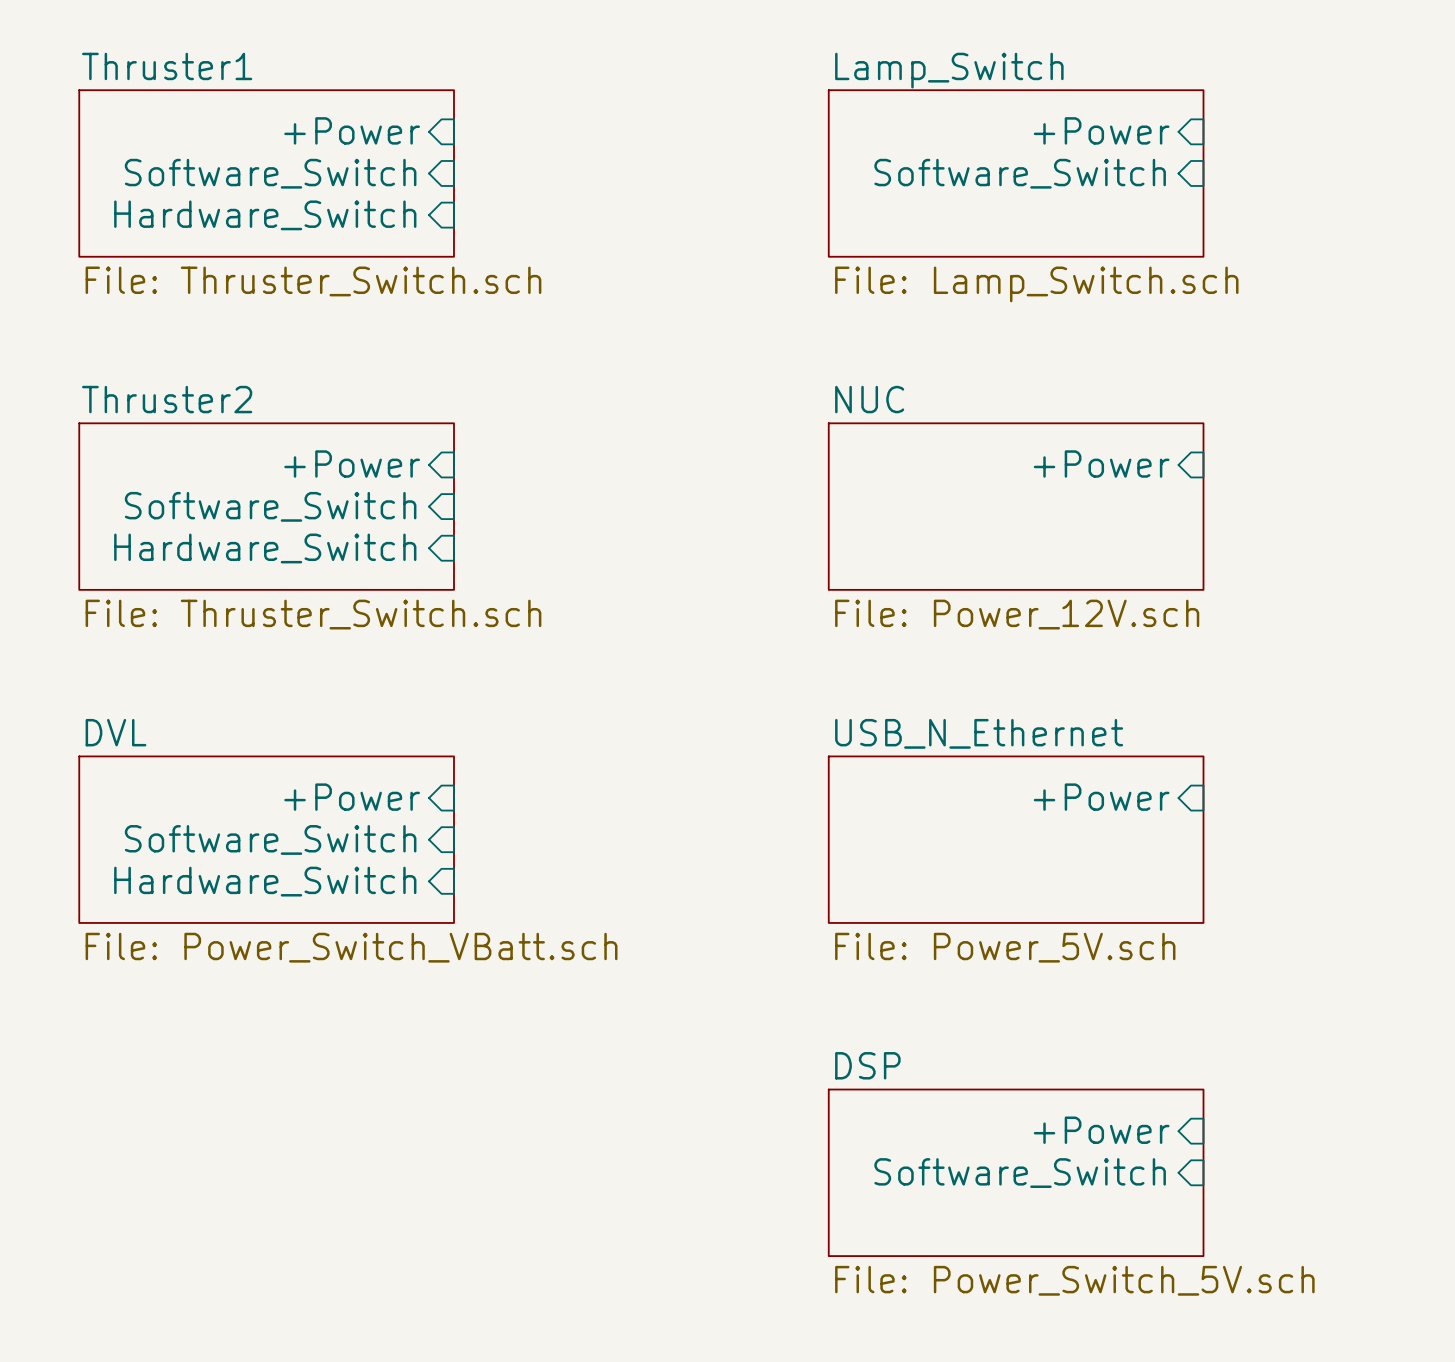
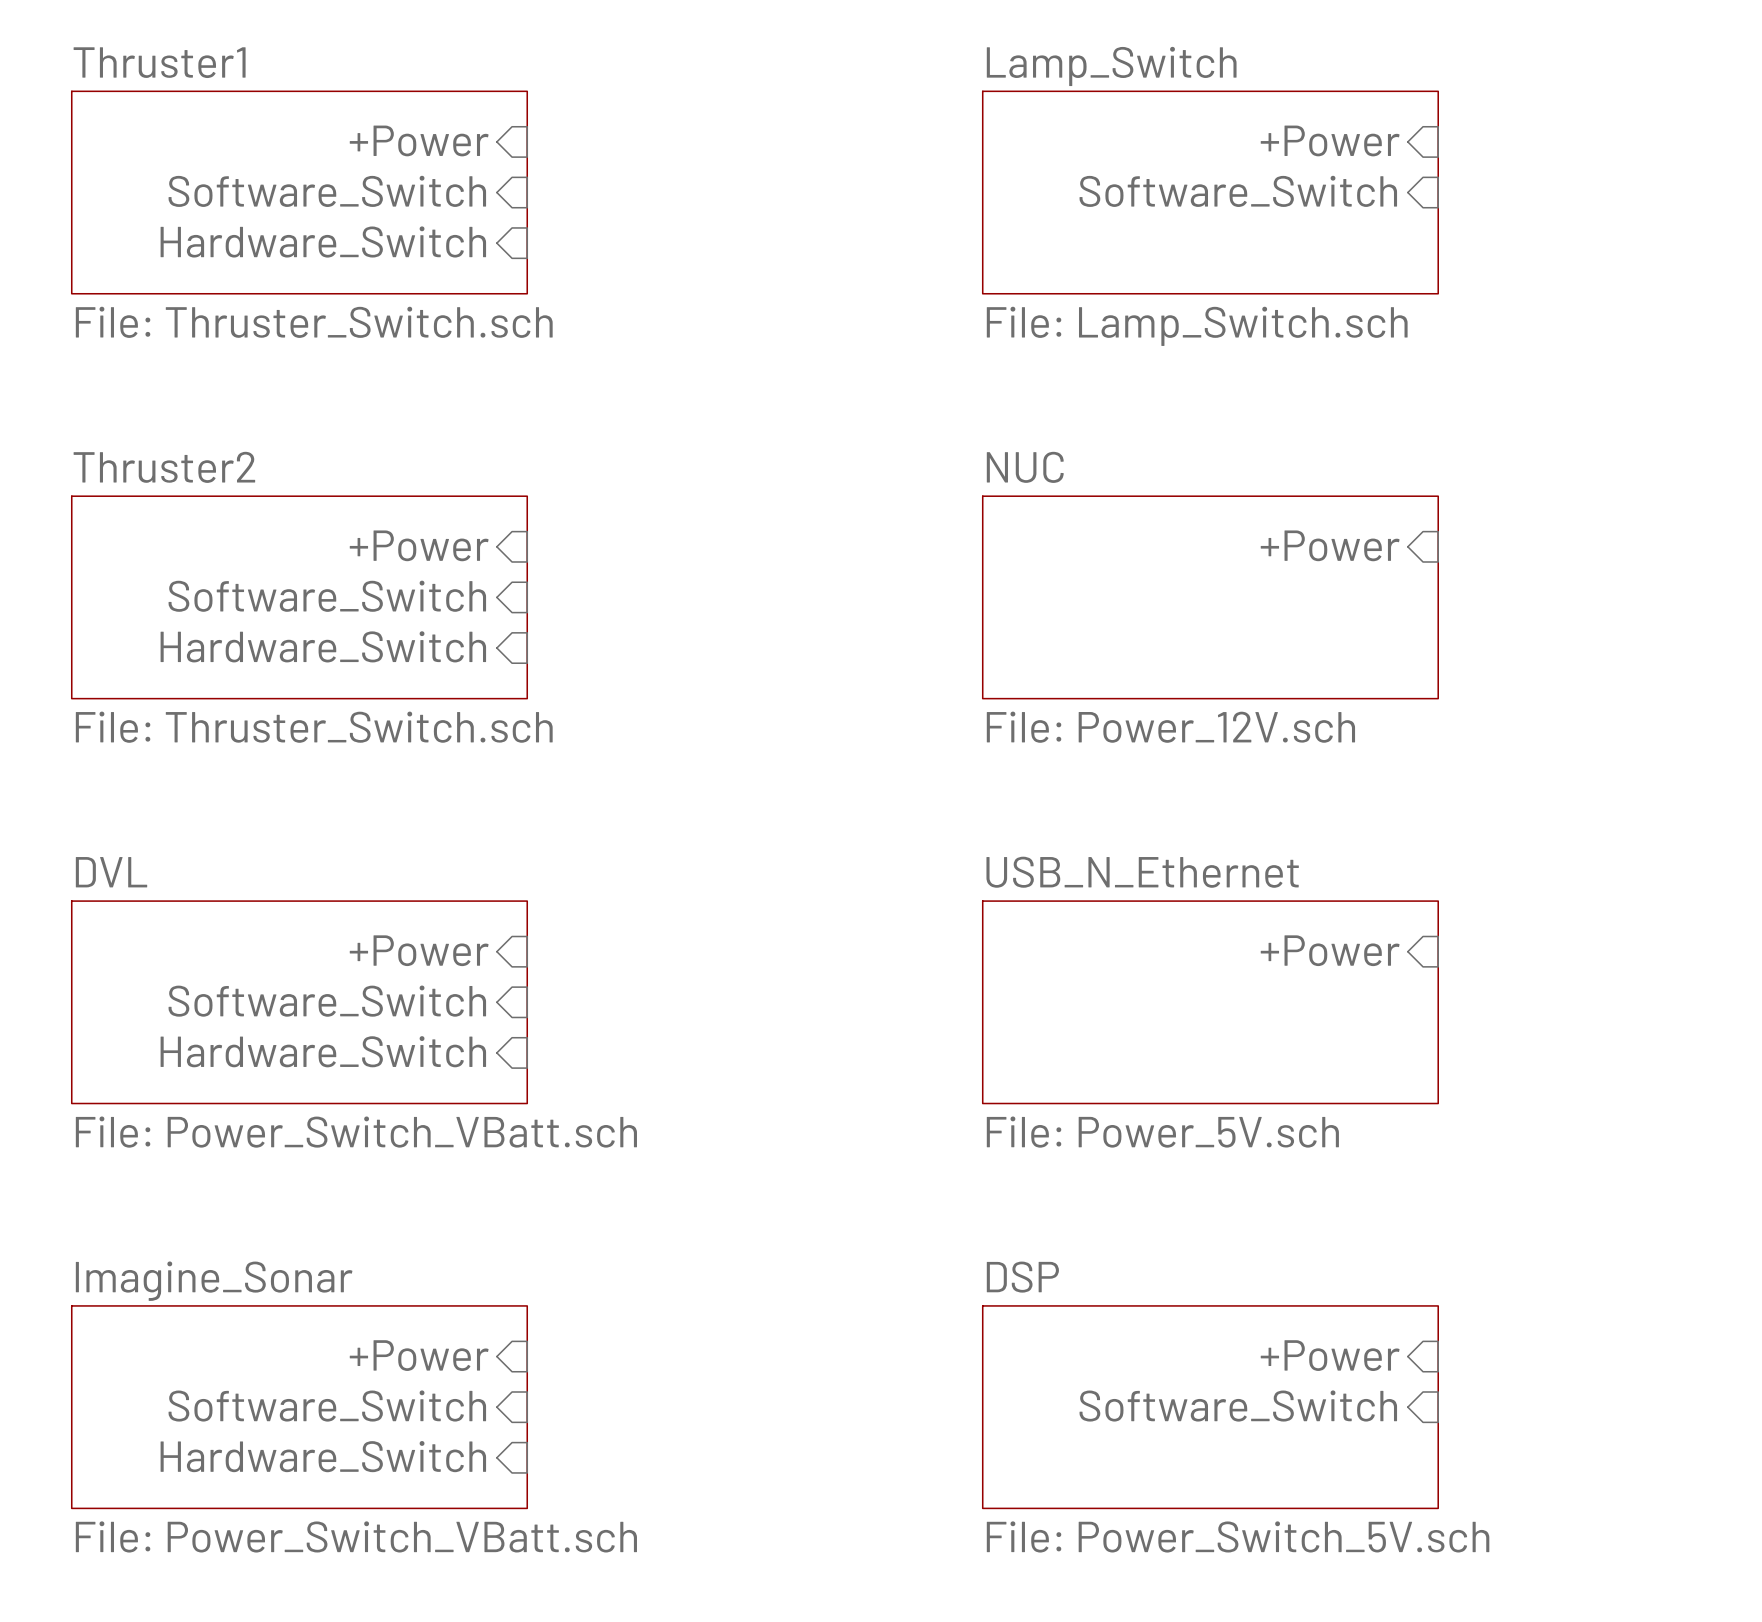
sheet pin: none -> +Power (419, 1355)
sheet Imagine_Sonar: none -> File: Power_Switch_VBatt.sch (299, 1407)
sheet pin: none -> Software_Switch (327, 1406)
sheet pin: none -> Hardware_Switch (323, 1456)

